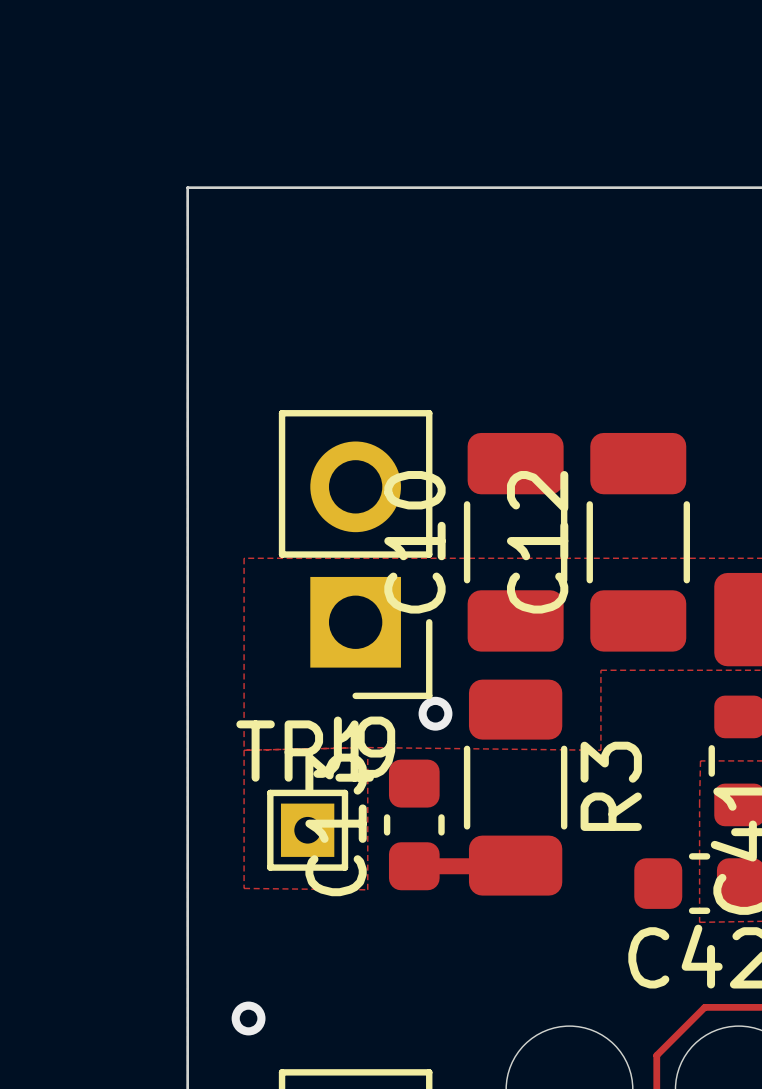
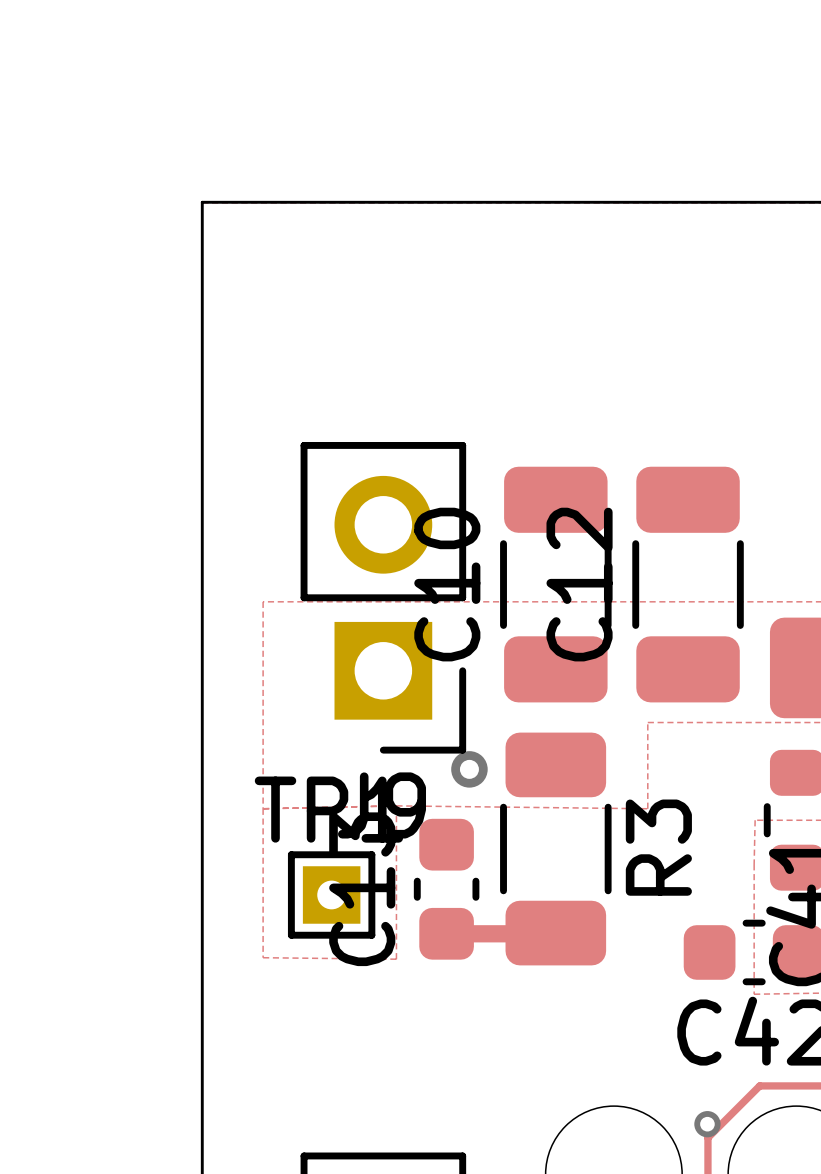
via: (248, 1018) -> none
via: none -> (707, 1124)

